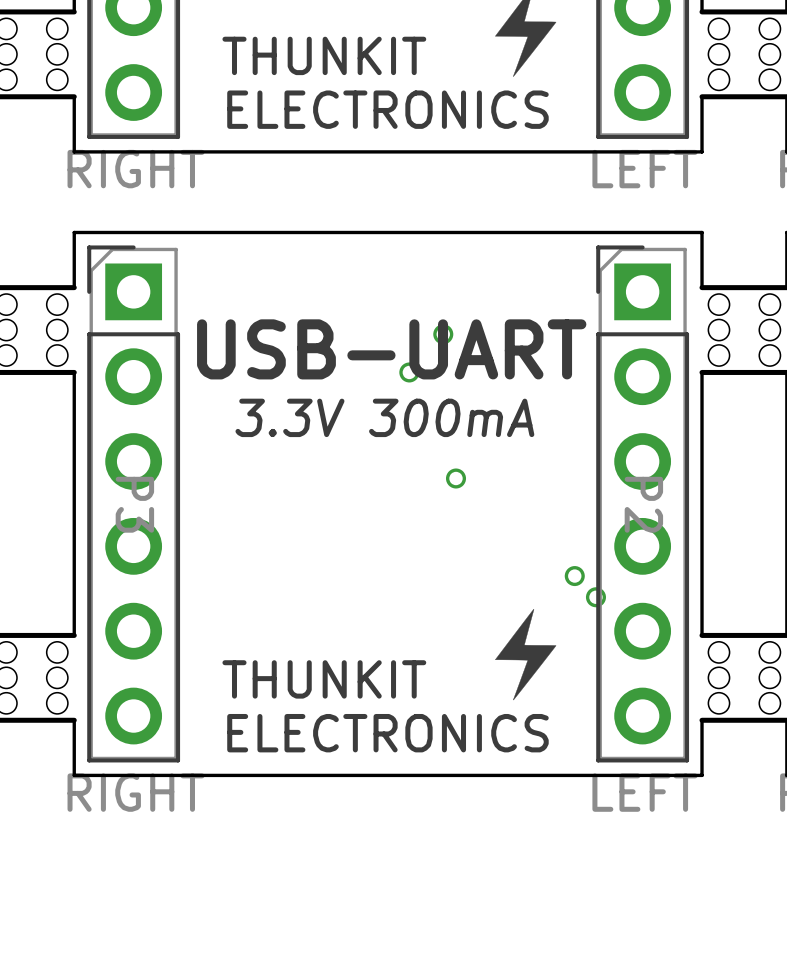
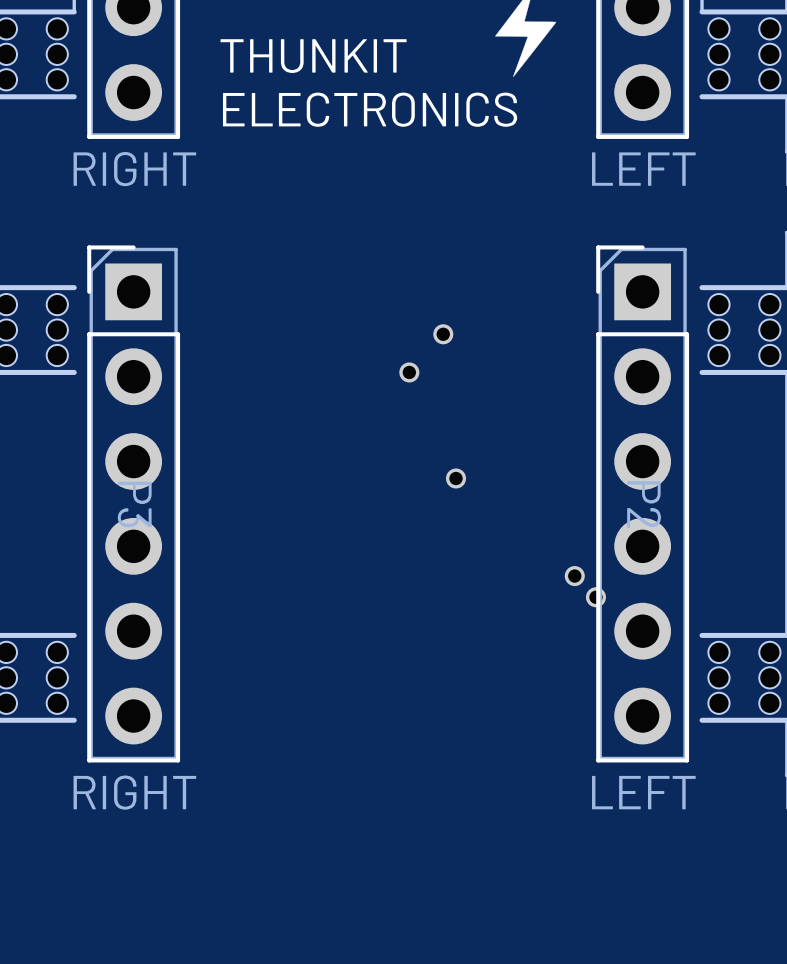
board edge: (702, 96) (702, 151) (74, 151) (74, 96) -> none
board edge: (702, 287) (702, 232) (74, 232) (74, 287) -> none
text: USB-UART (391, 349) -> none
board edge: (74, 372) (74, 635) -> none
board edge: (702, 372) (702, 635) -> none
text: 3.3V 300mA (384, 417) -> none
drawing: [495, 609, 557, 701] -> none
text: THUNKIT (324, 679) -> none
board edge: (702, 720) (702, 775) (74, 775) (74, 720) -> none
text: ELECTRONICS (387, 733) -> none

